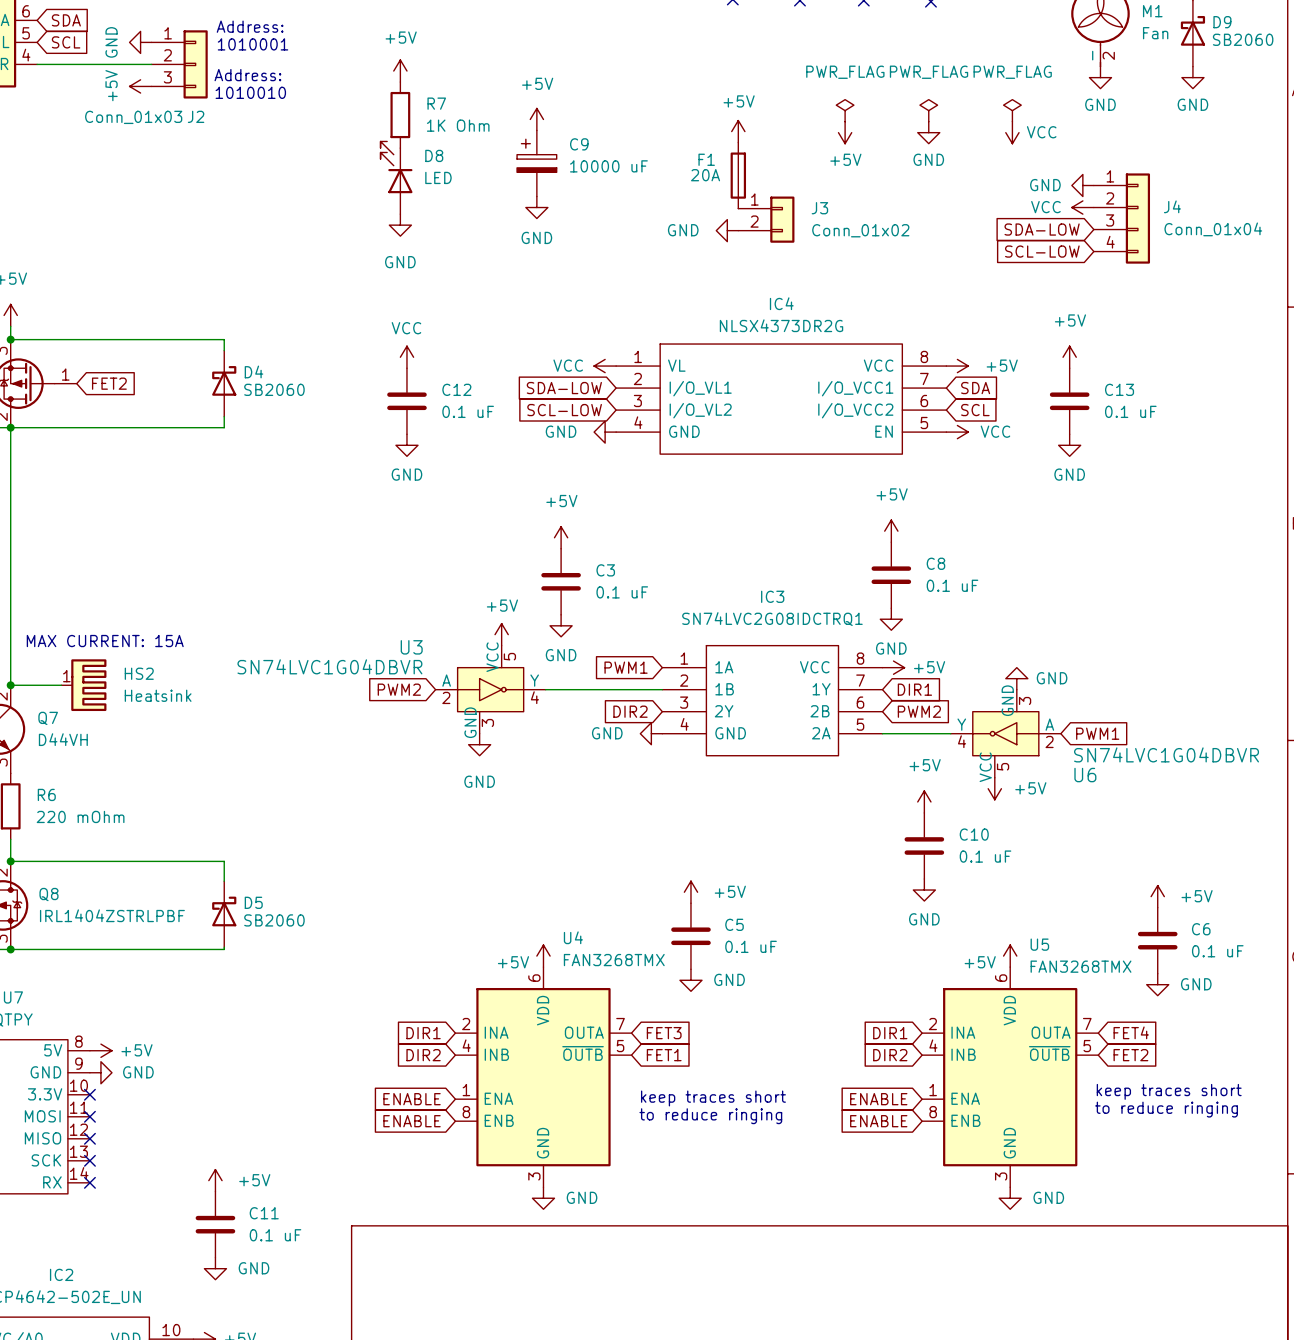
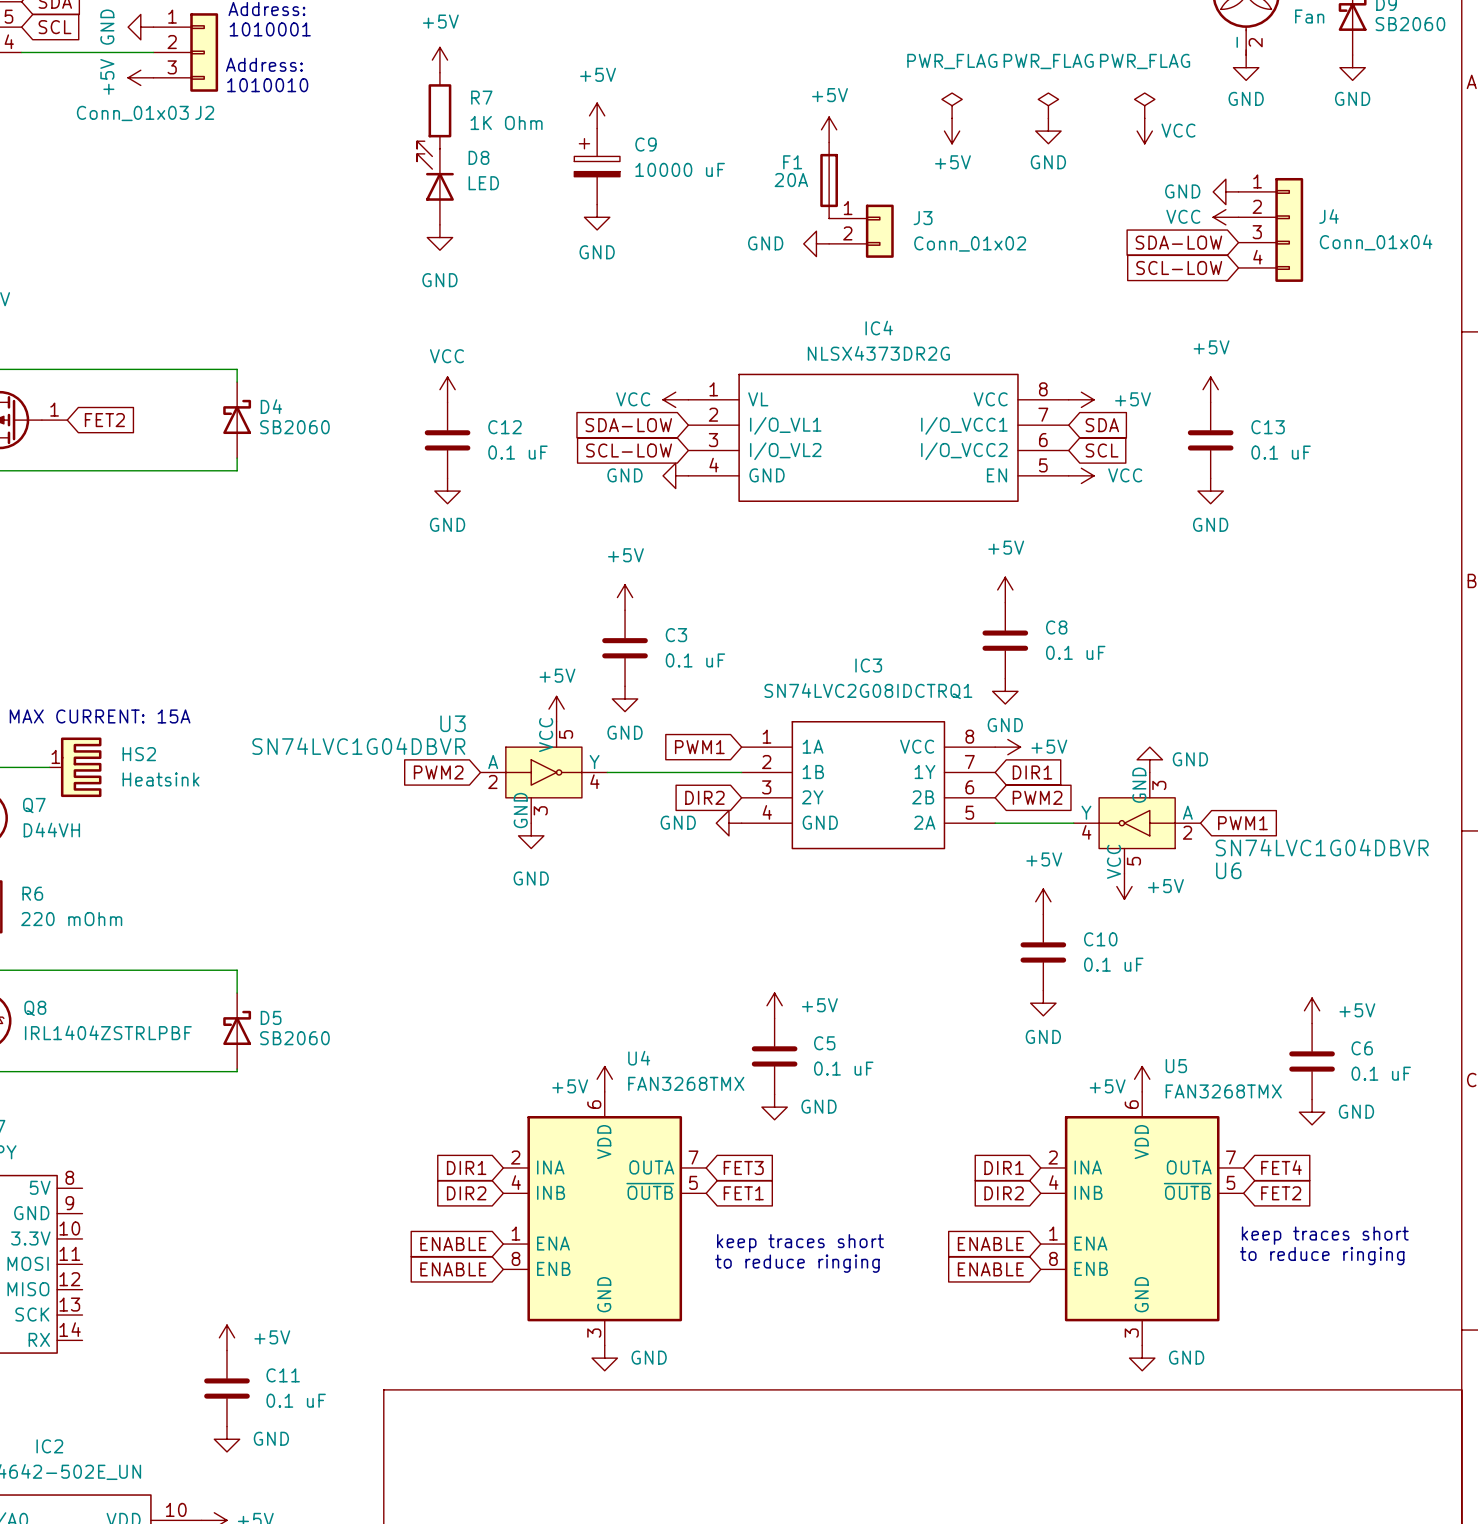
power symbol: +5V (100, 1050) -> none
power symbol: GND (100, 1072) -> none
no-connect mark: (89, 1094) -> none
no-connect mark: (89, 1116) -> none
no-connect mark: (89, 1138) -> none
no-connect mark: (89, 1160) -> none
no-connect mark: (89, 1182) -> none

